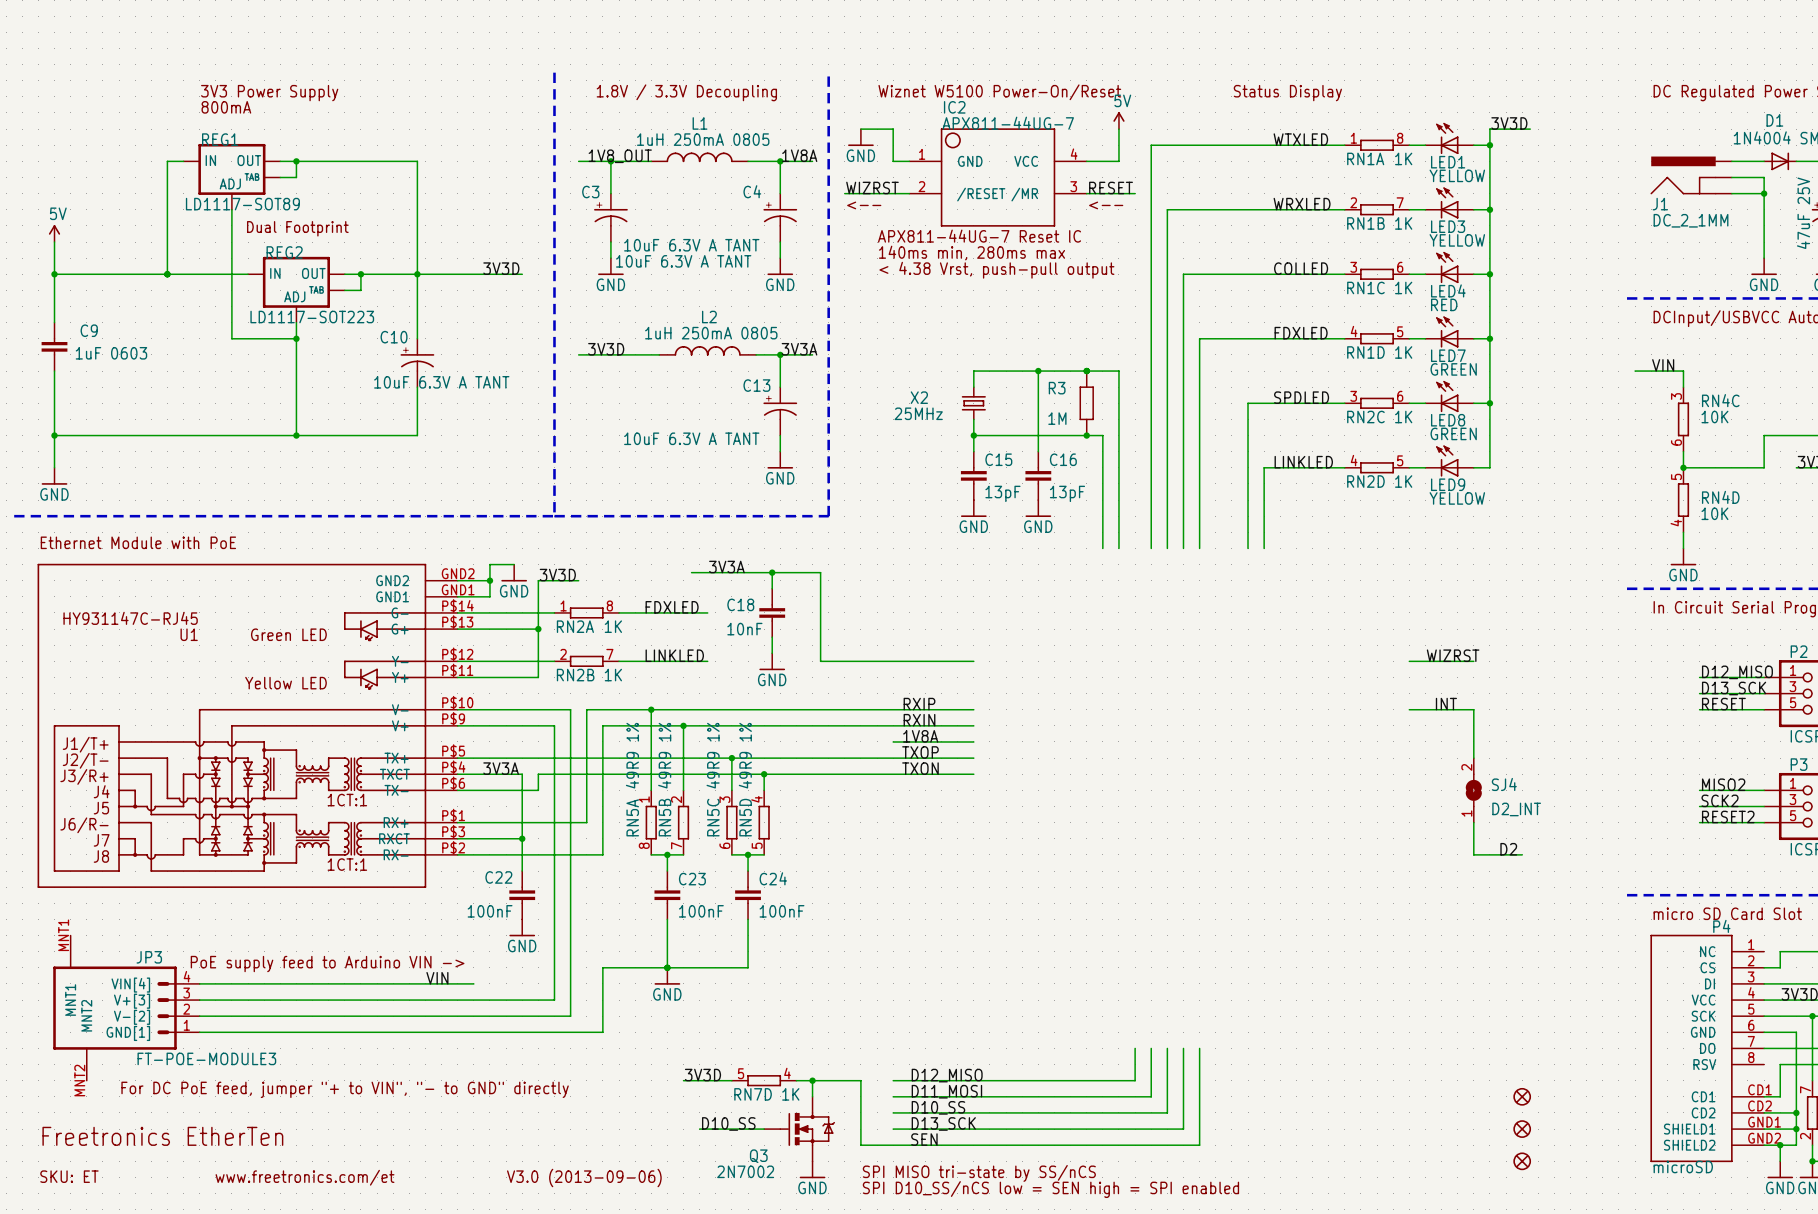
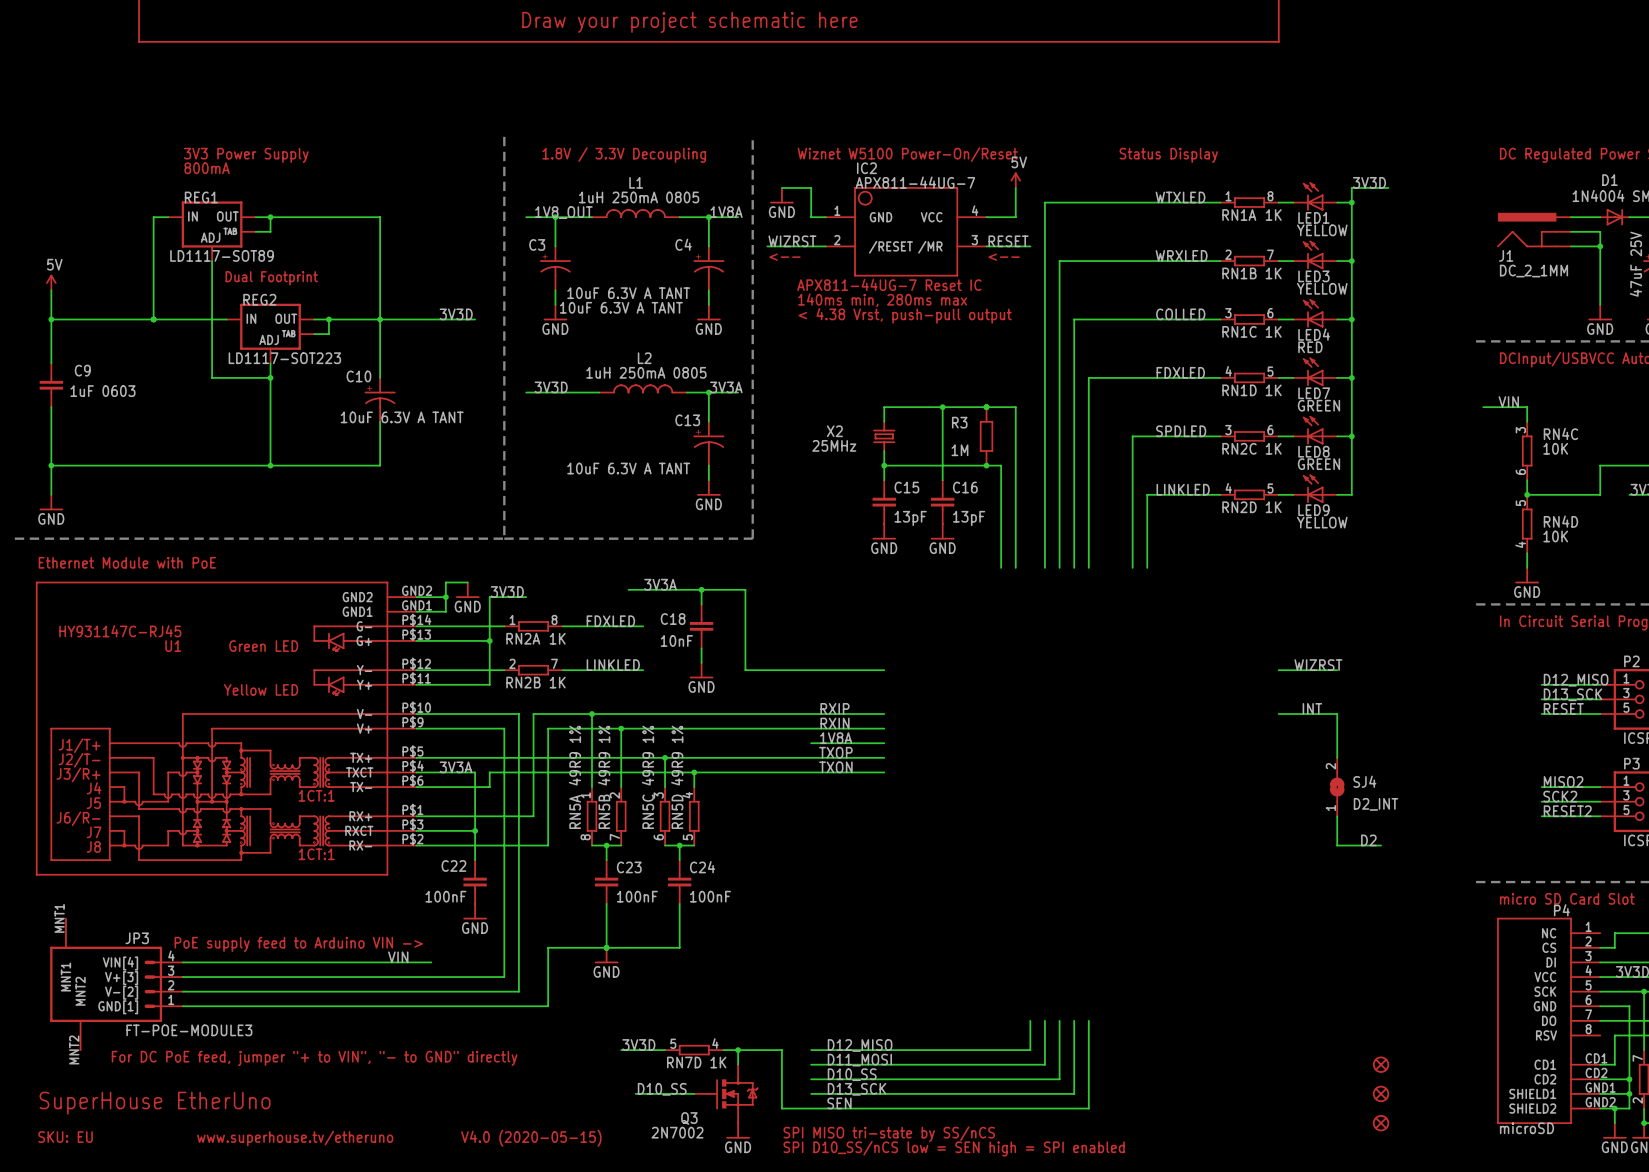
text: Freetronics EtherTen (162, 1136) -> SuperHouse EtherUno (155, 1103)
text: SKU: ET (69, 1176) -> SKU: EU (65, 1137)
text: www.freetronics.com/et (305, 1177) -> www.superhouse.tv/etheruno (295, 1138)
text: V3.0 (2013-09-06) (584, 1177) -> V4.0 (2020-05-15) (531, 1138)

